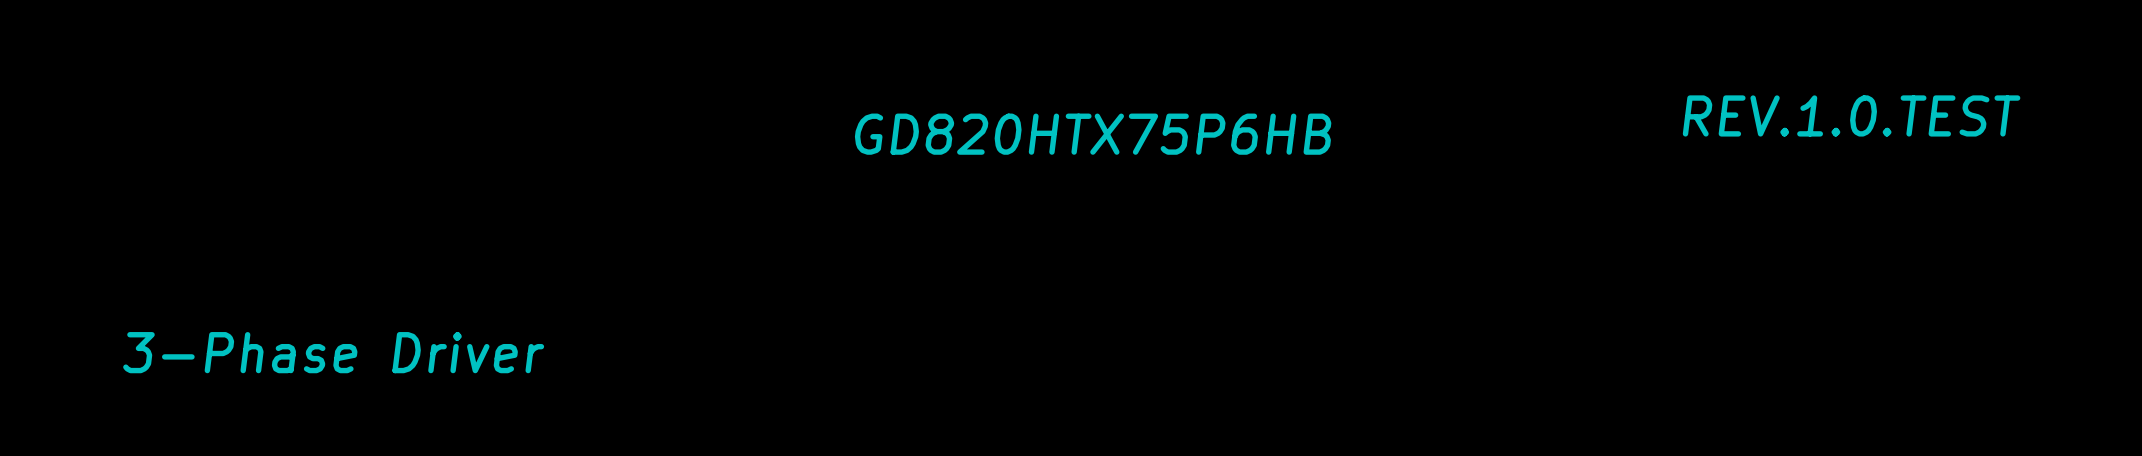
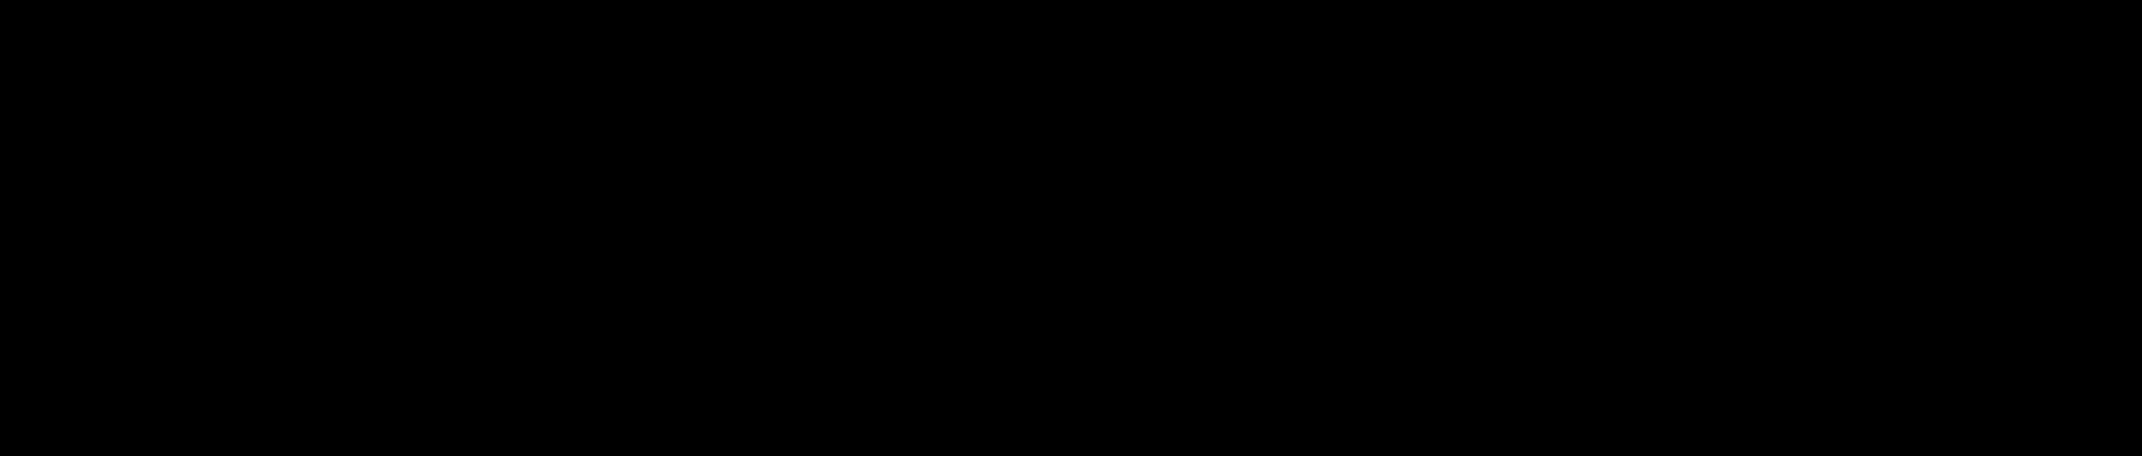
text: REV.1.0.TEST (1851, 115) -> none
text: GD820HTX75P6HB (1093, 134) -> none
text: 3-Phase Driver (333, 352) -> none

